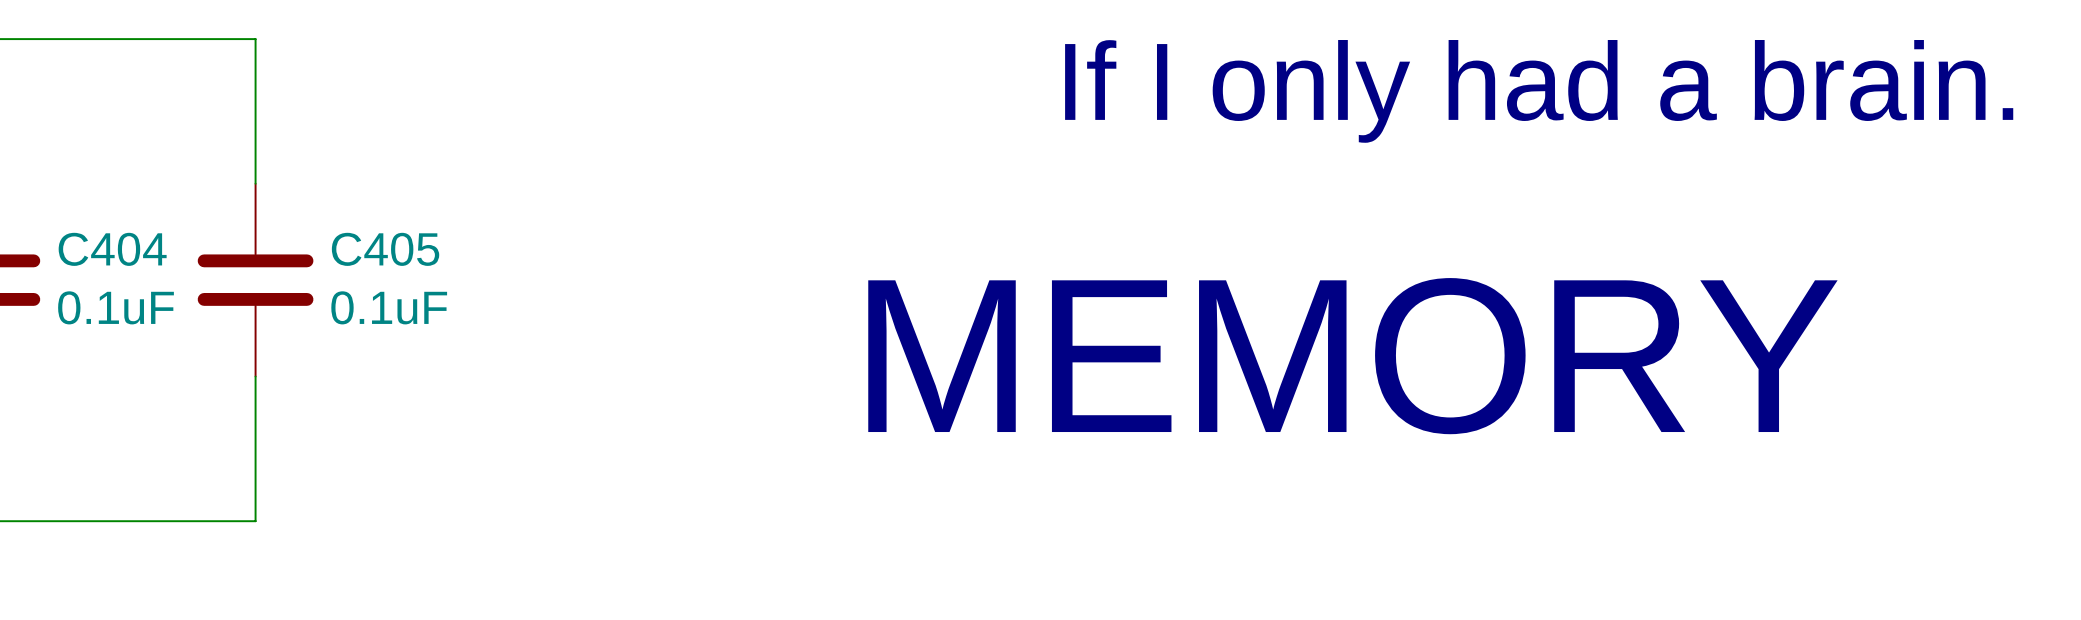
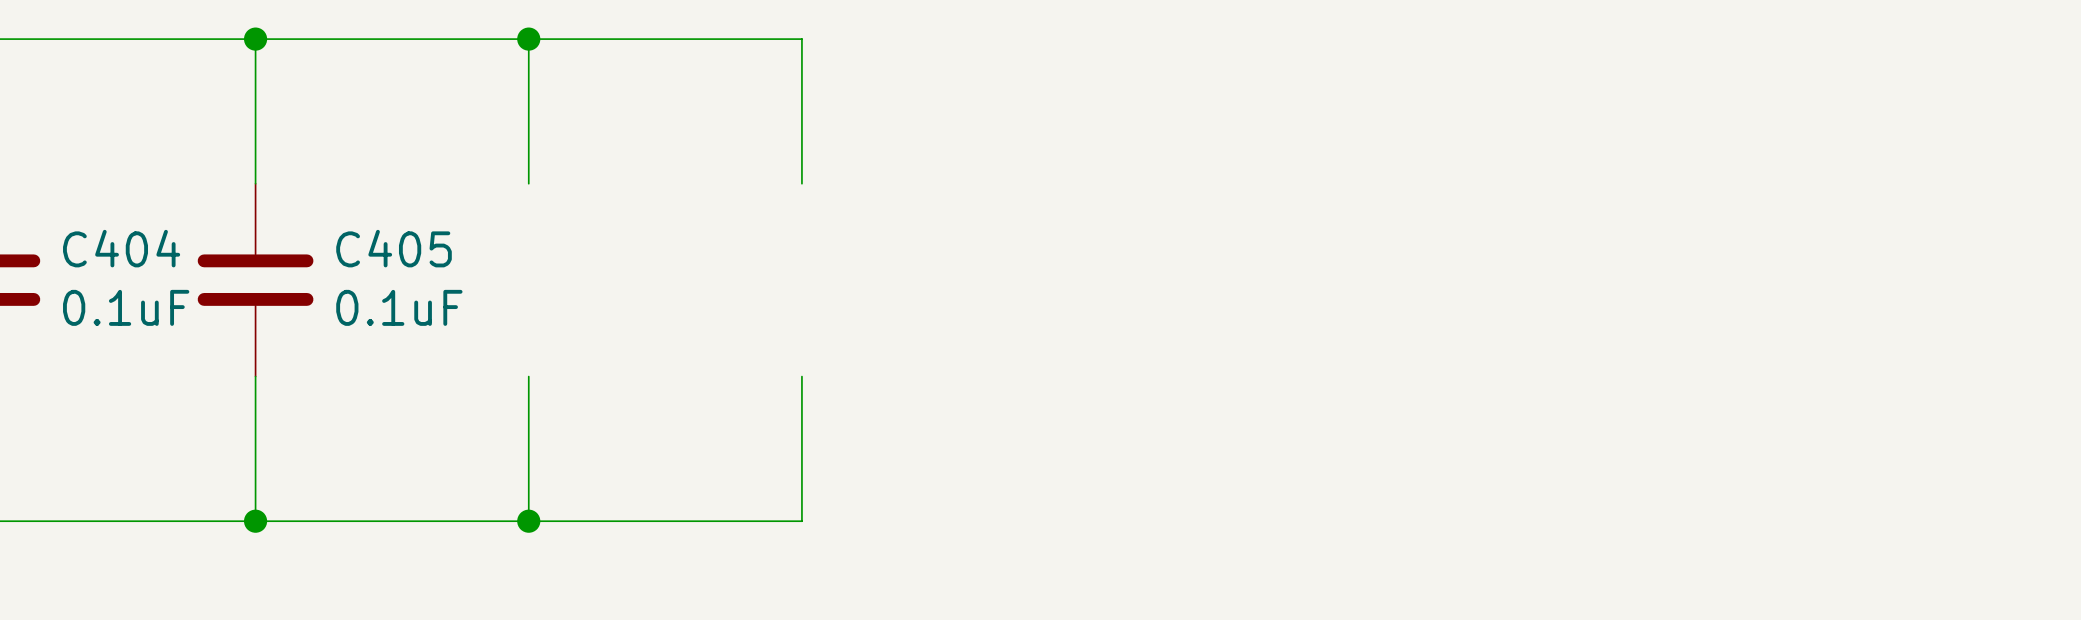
wire: none -> (255, 39) (801, 39) (801, 183)
junction: none -> (255, 39)
wire: none -> (528, 39) (528, 183)
junction: none -> (528, 39)
text: If I only had a brain. (1539, 91) -> none
text: MEMORY (1352, 356) -> none
wire: none -> (528, 376) (528, 521)
wire: none -> (801, 376) (801, 521) (255, 521)
junction: none -> (255, 521)
junction: none -> (528, 521)

